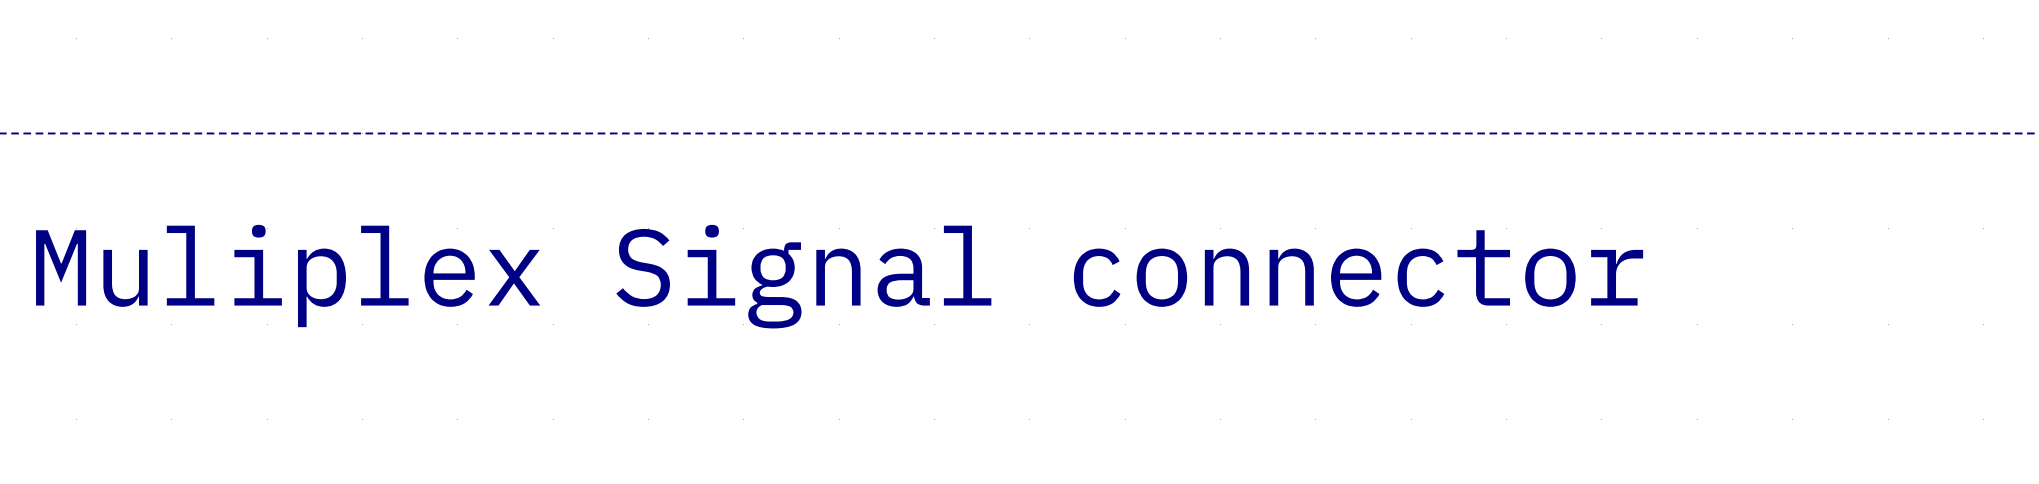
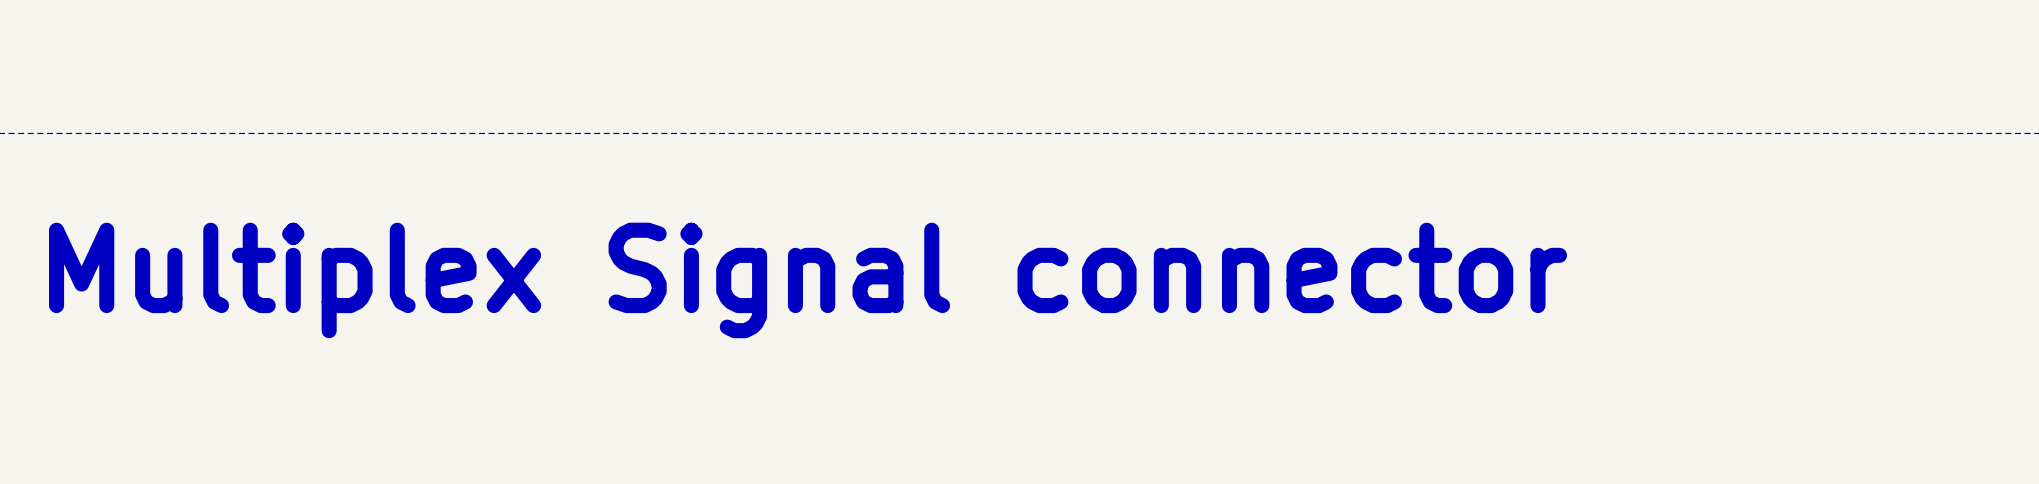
text: Muliplex Signal connector (839, 276) -> Multiplex Signal connector (808, 280)

